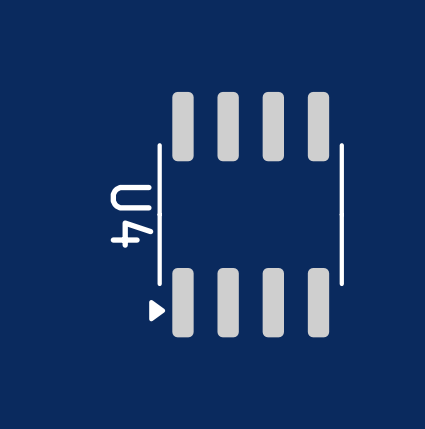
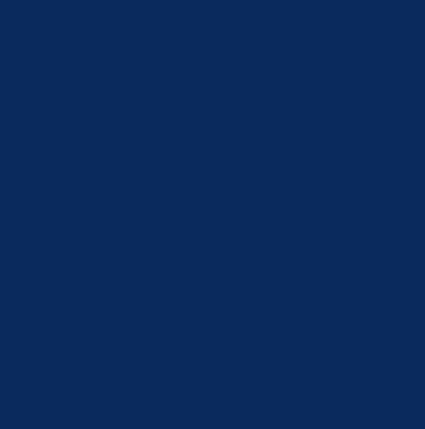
U4: (246, 214) -> none

